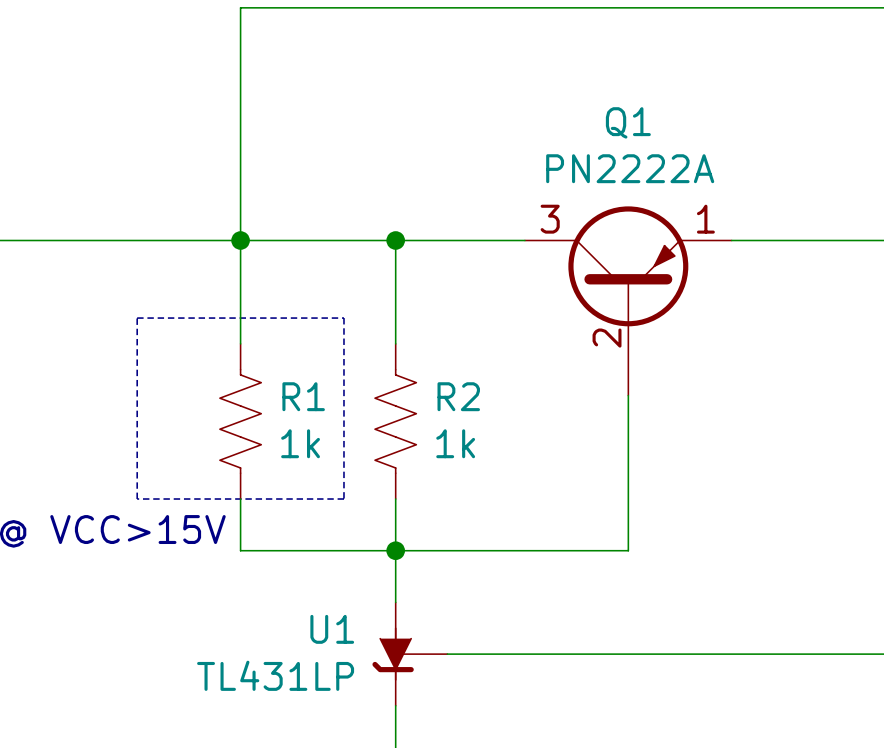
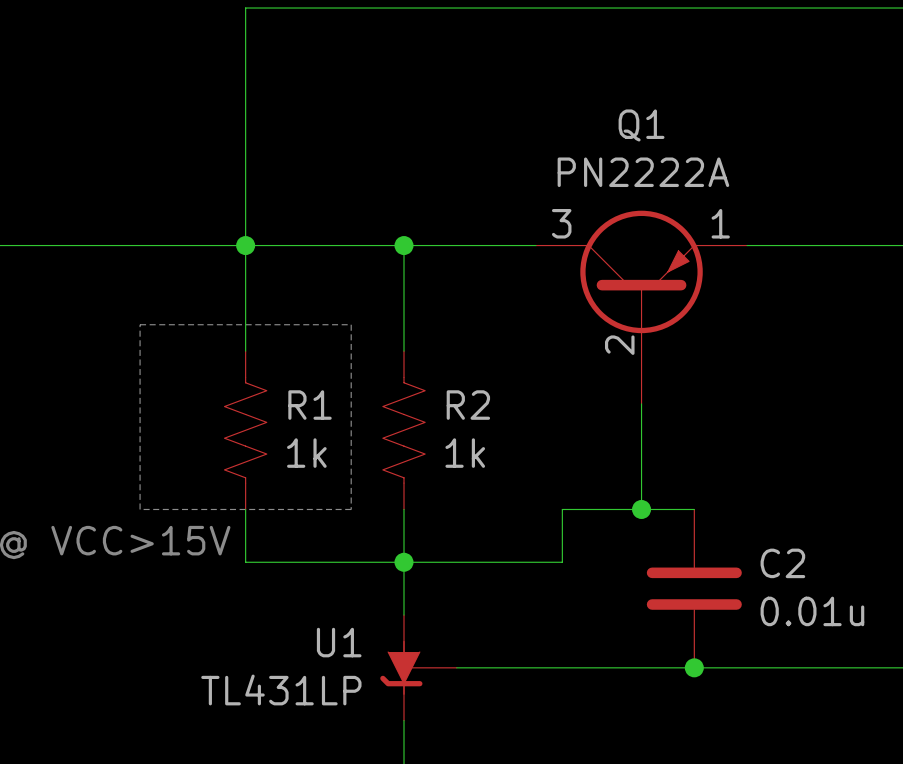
wire: (628, 499) (628, 550) (550, 550) -> (694, 509) (562, 509) (562, 562)
junction: none -> (641, 509)
C2: none -> 0.01u (694, 588)
junction: none -> (694, 667)

